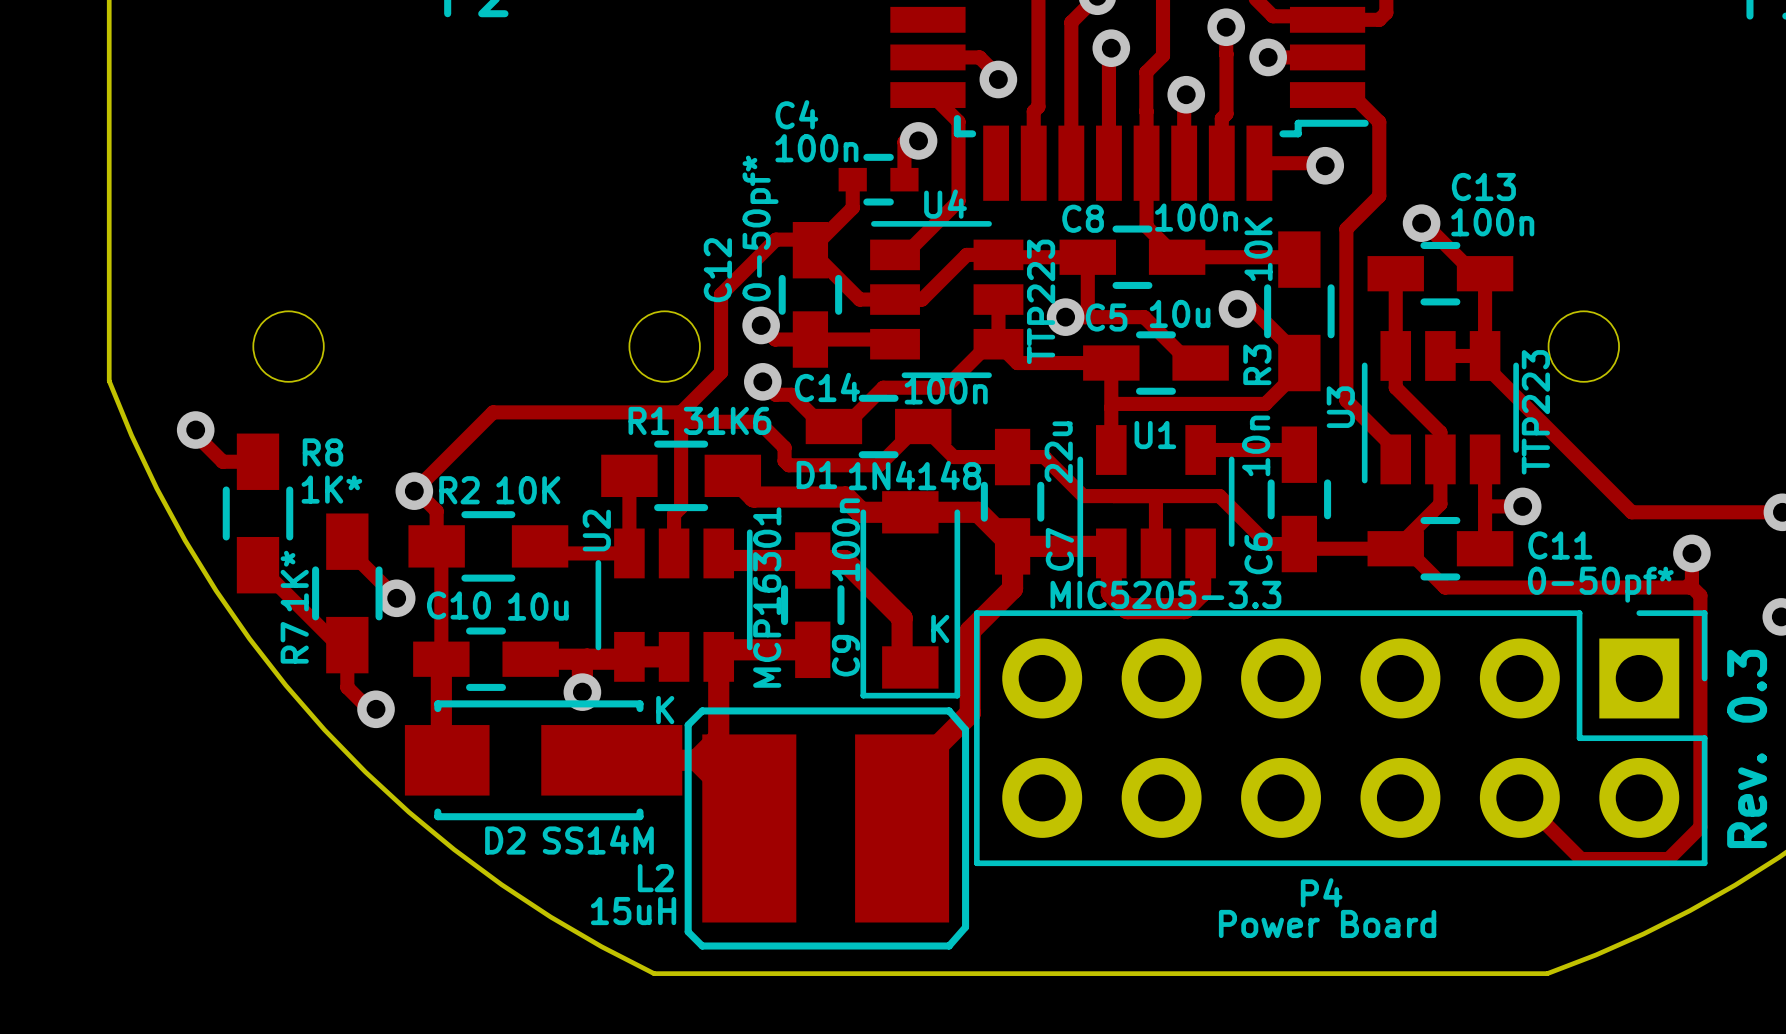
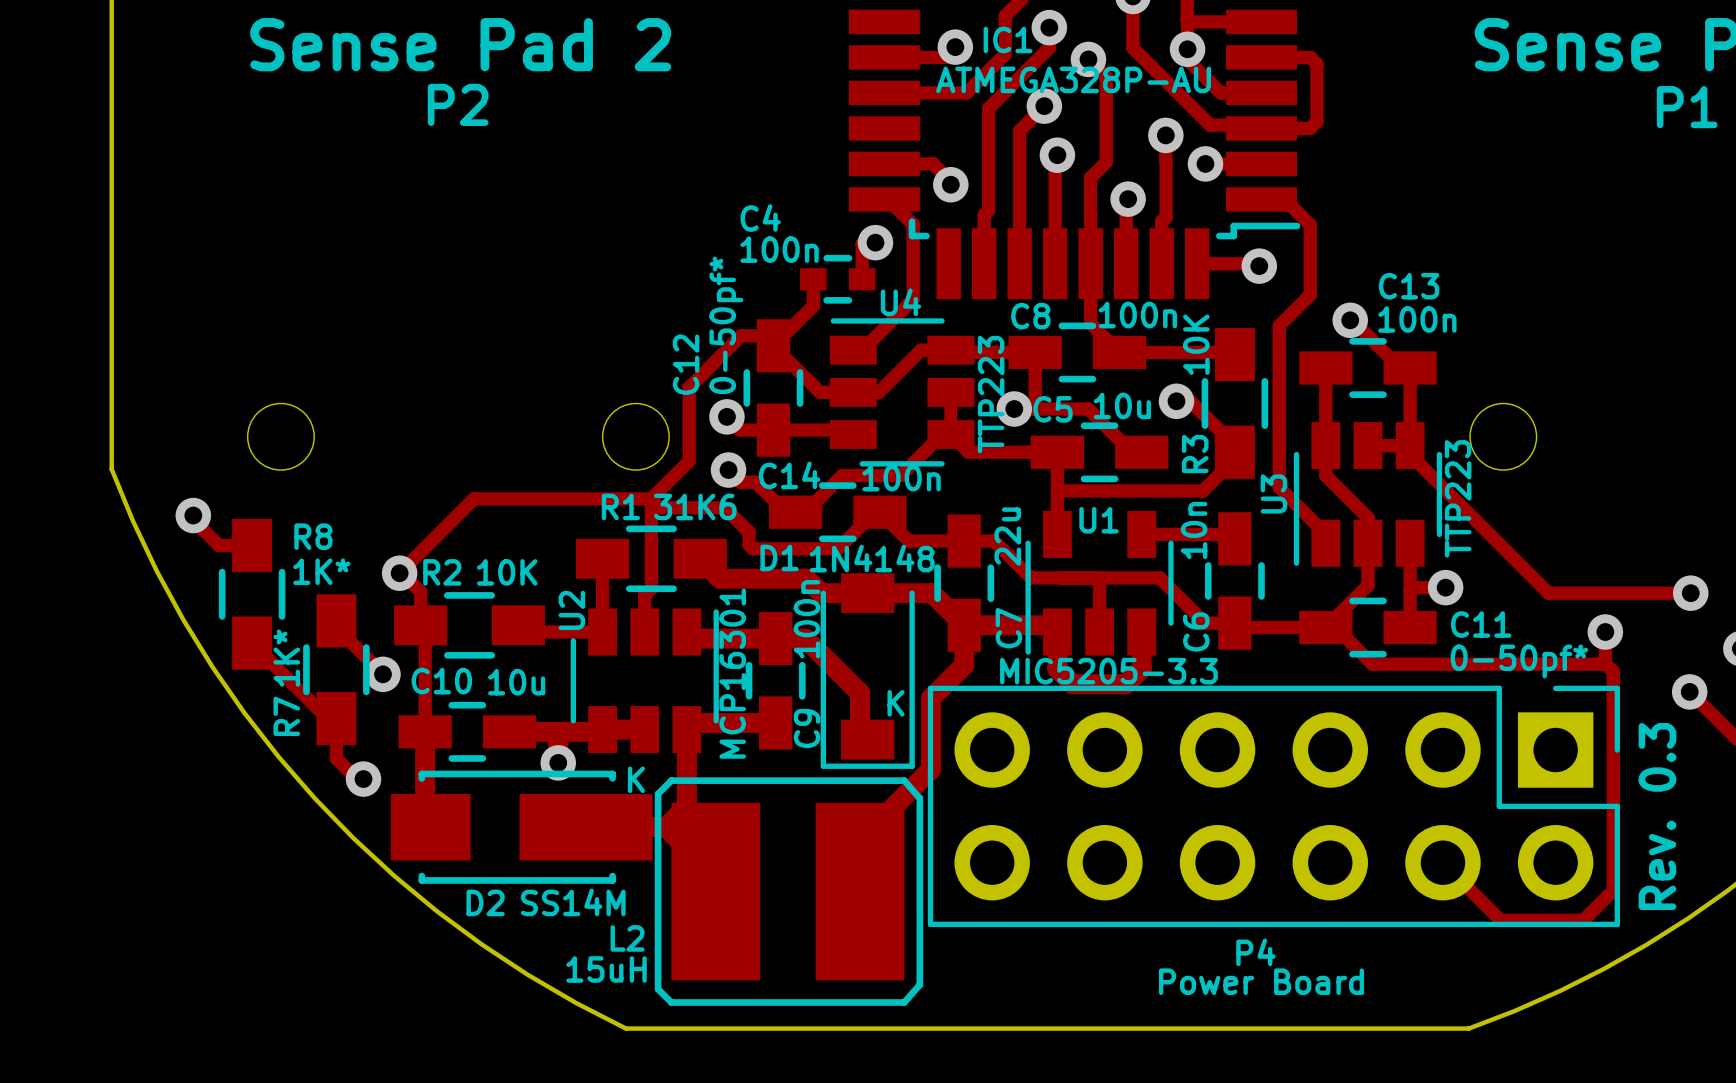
track: (977, 623) (970, 631) (970, 713) (902, 781) -> (930, 698) (930, 769) (859, 840) (859, 884)

